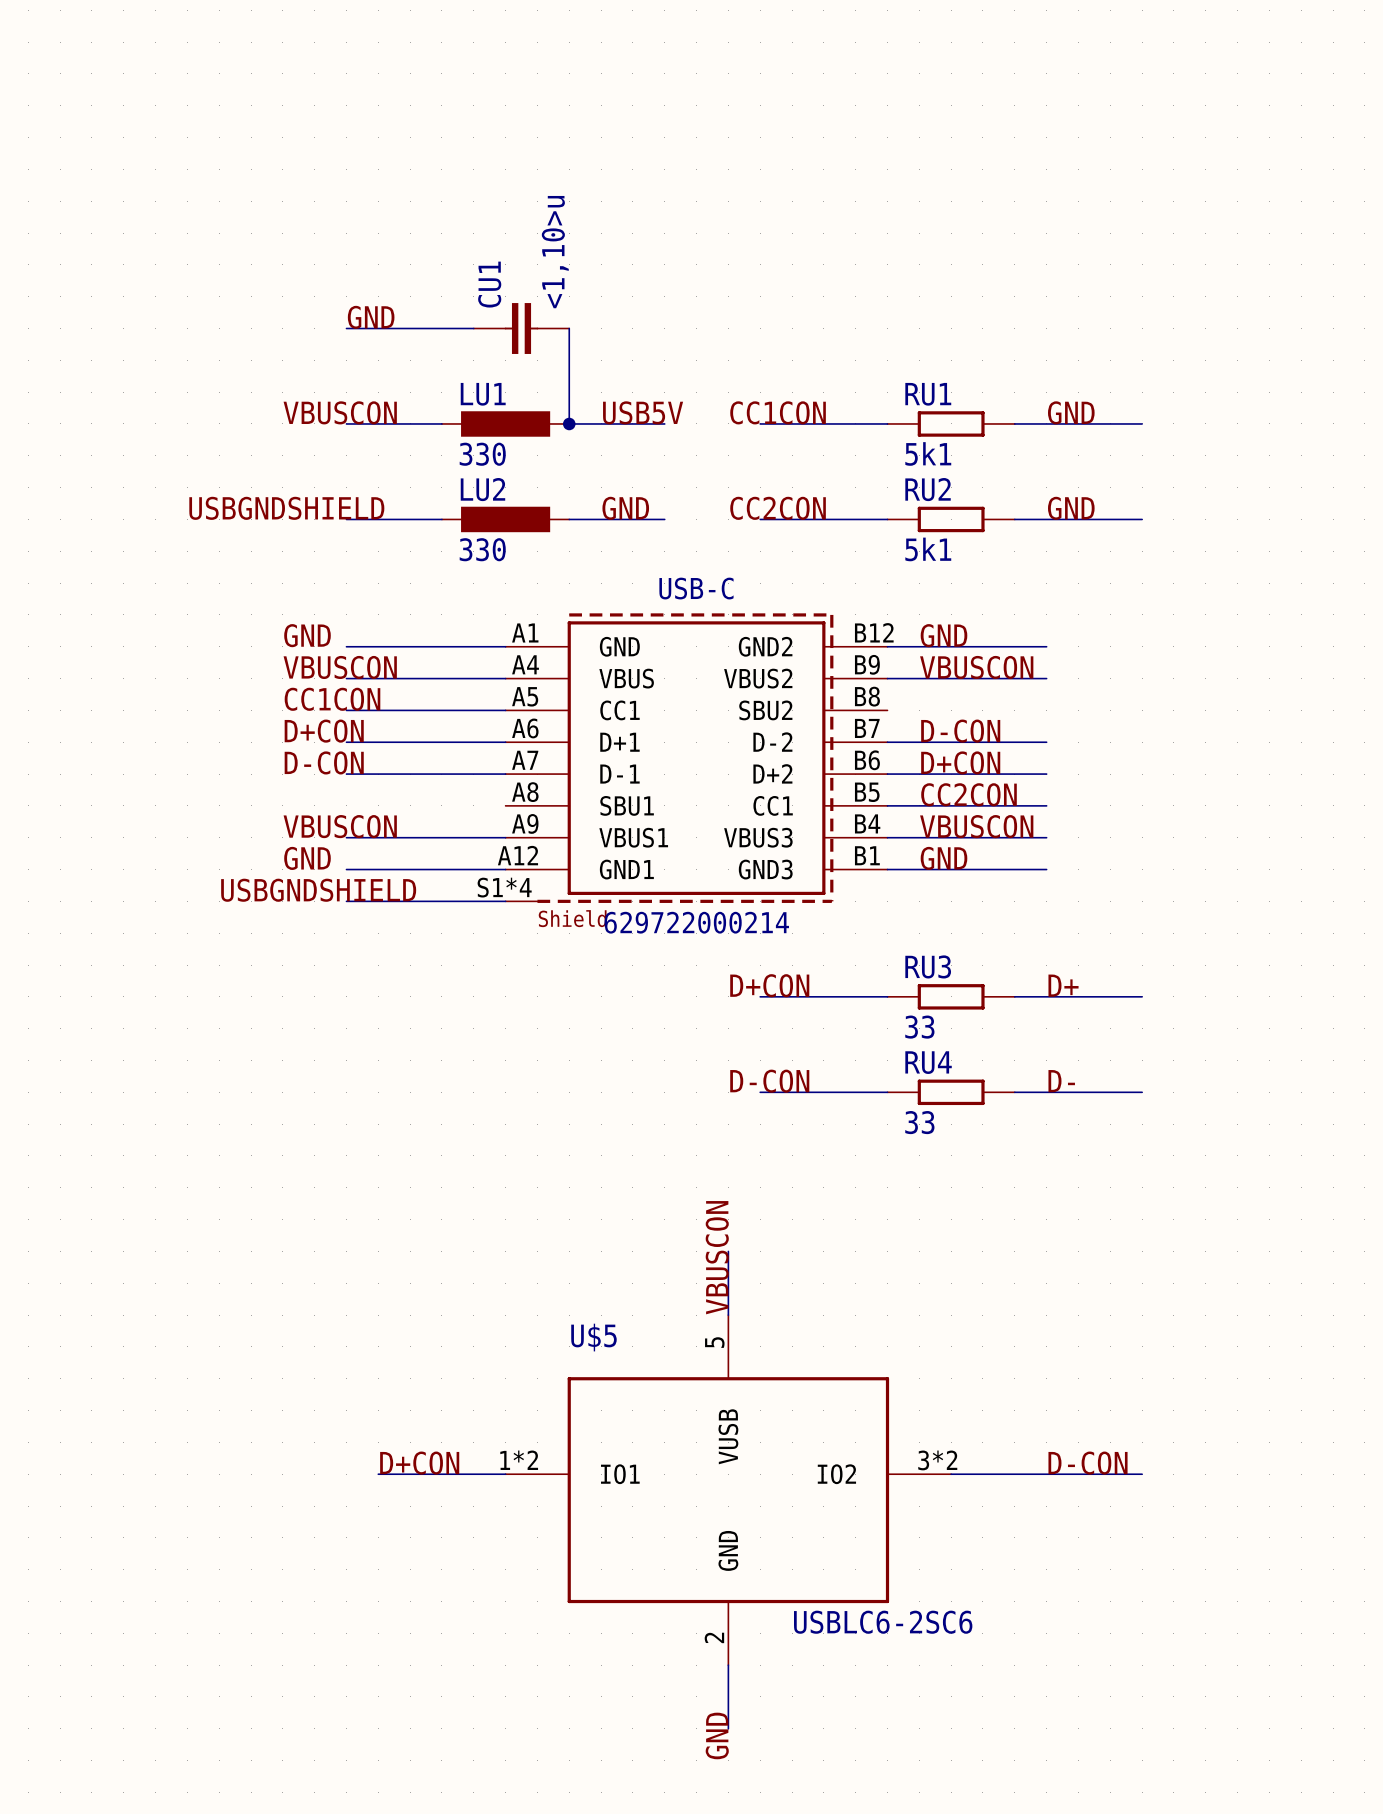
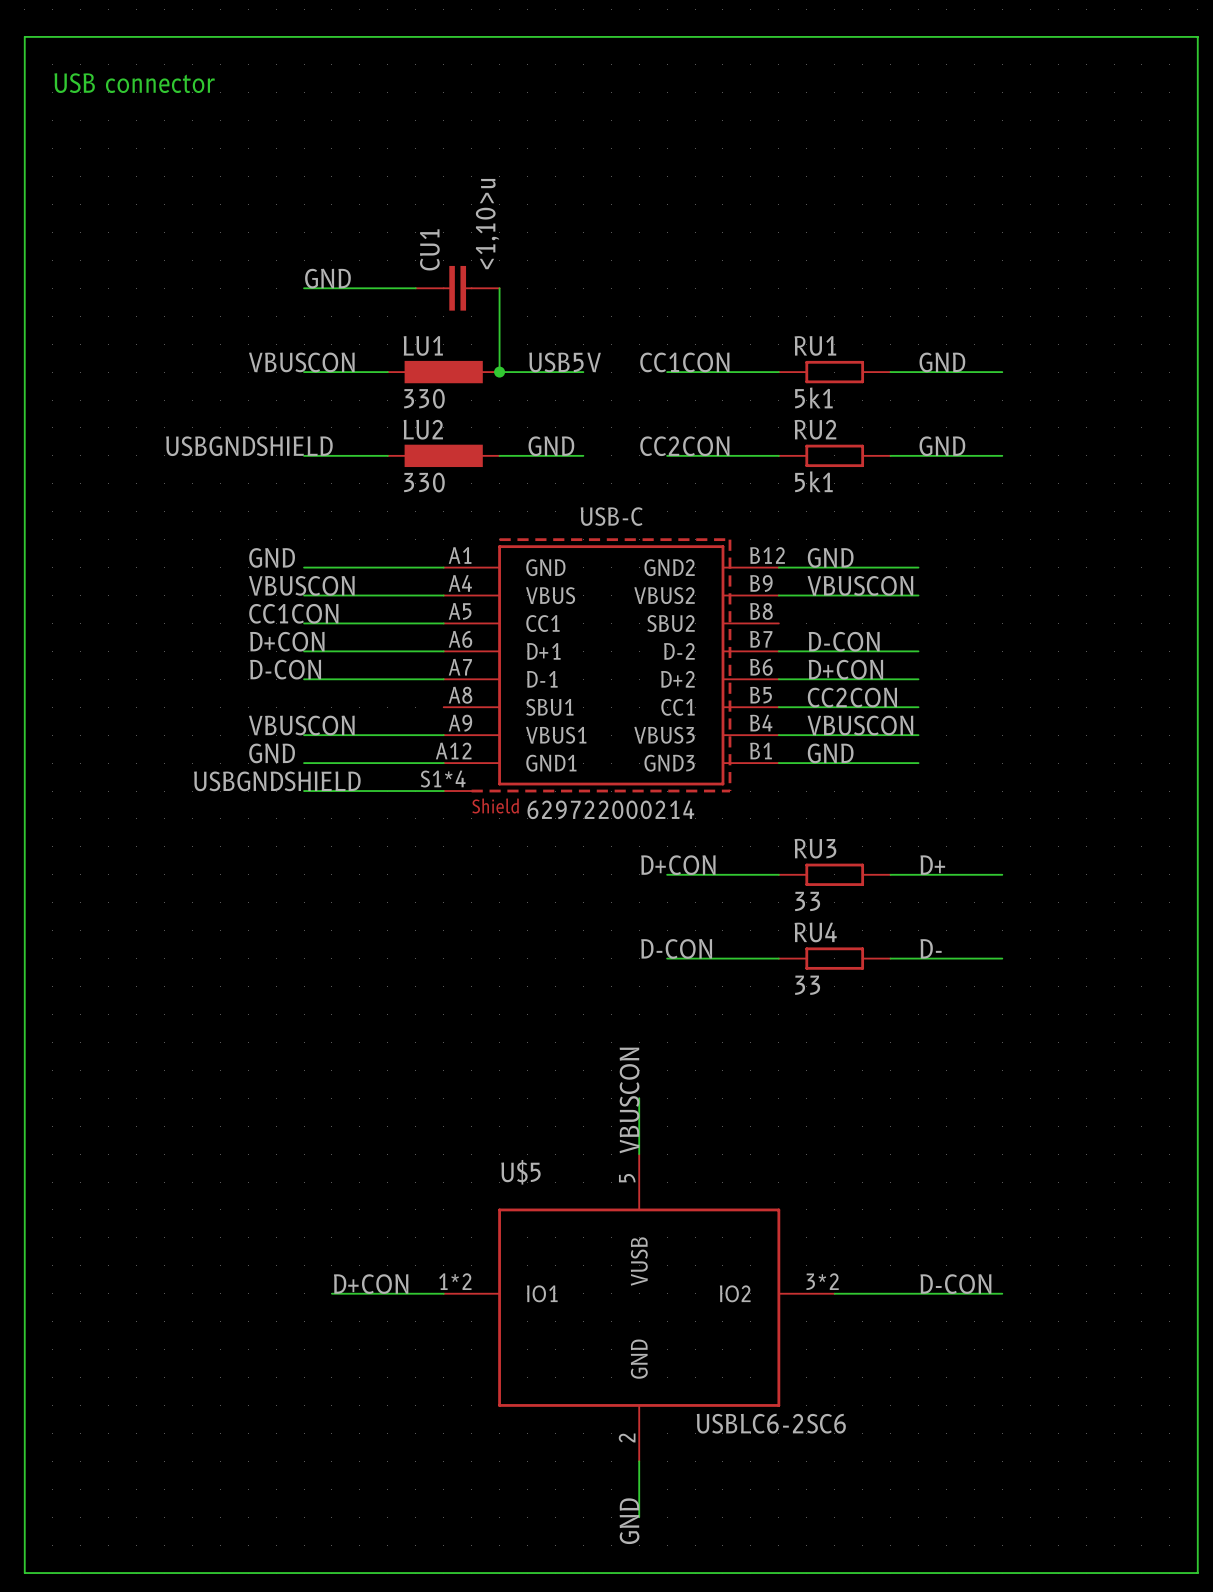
wire: none -> (24, 36) (24, 1573) (1197, 1573) (1197, 36) (24, 36)
text: none -> USB connector (134, 83)

